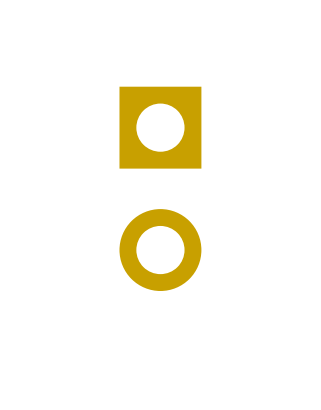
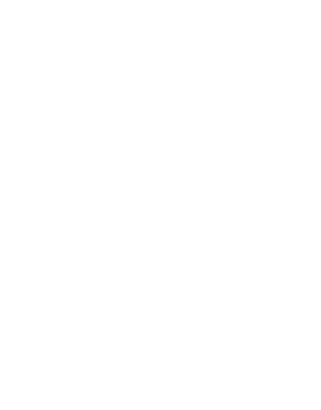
part: (160, 188) -> none

